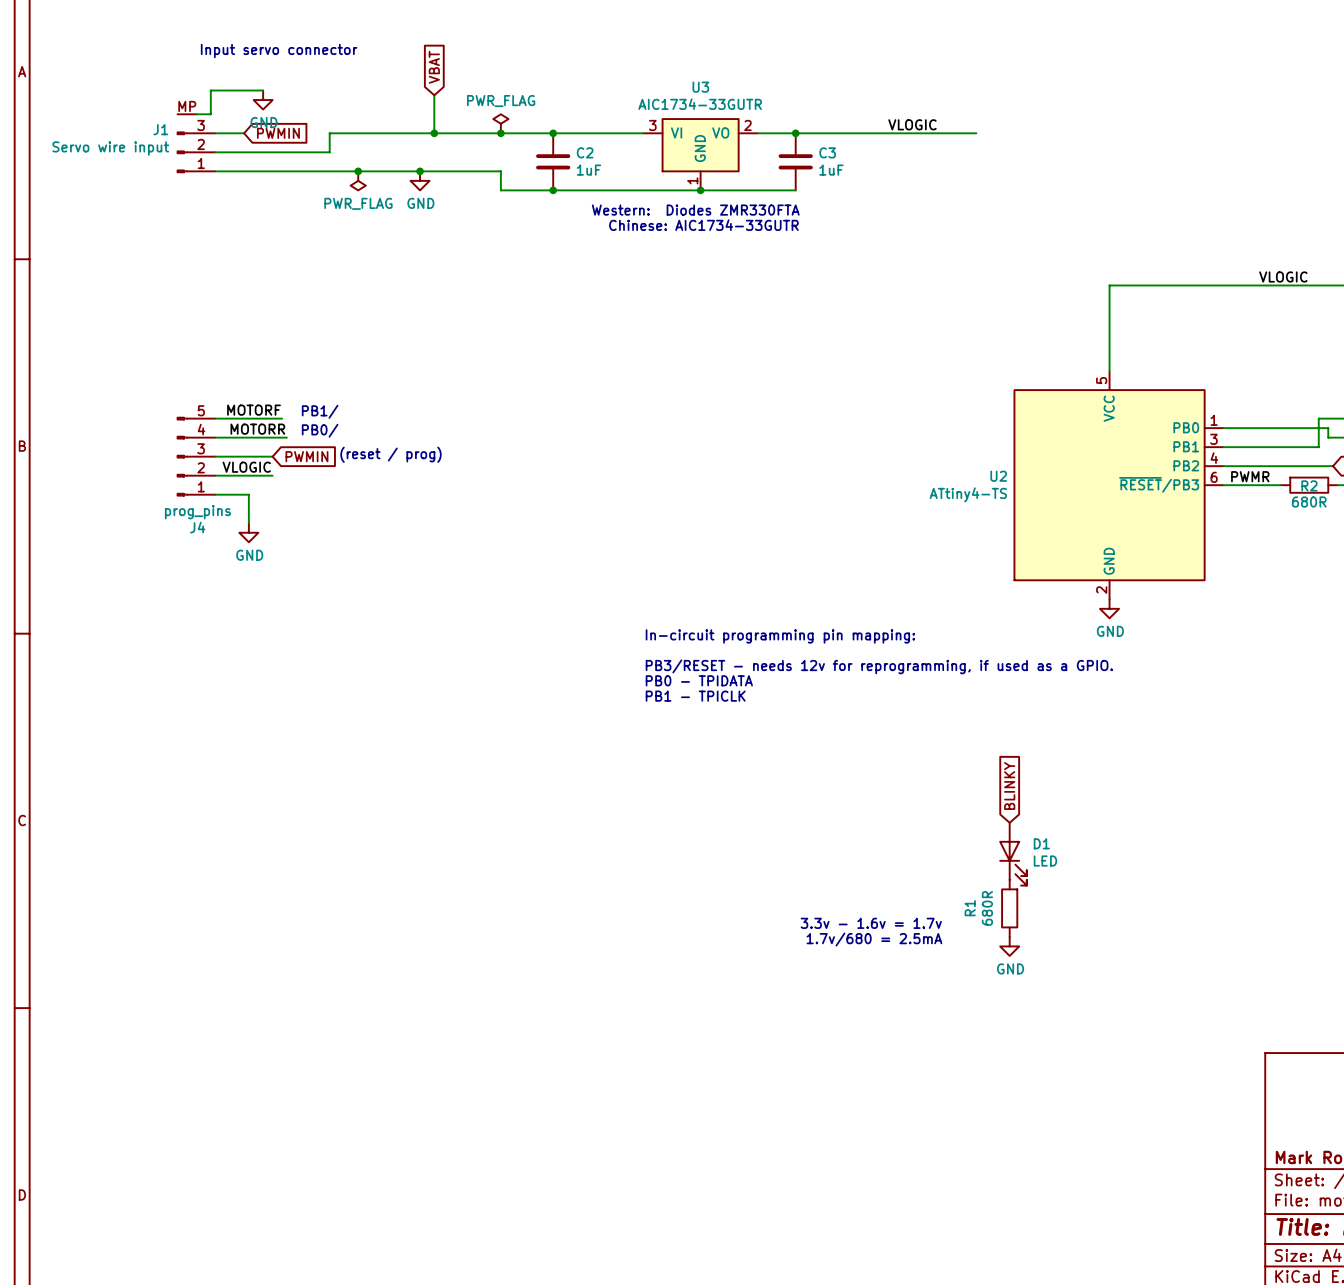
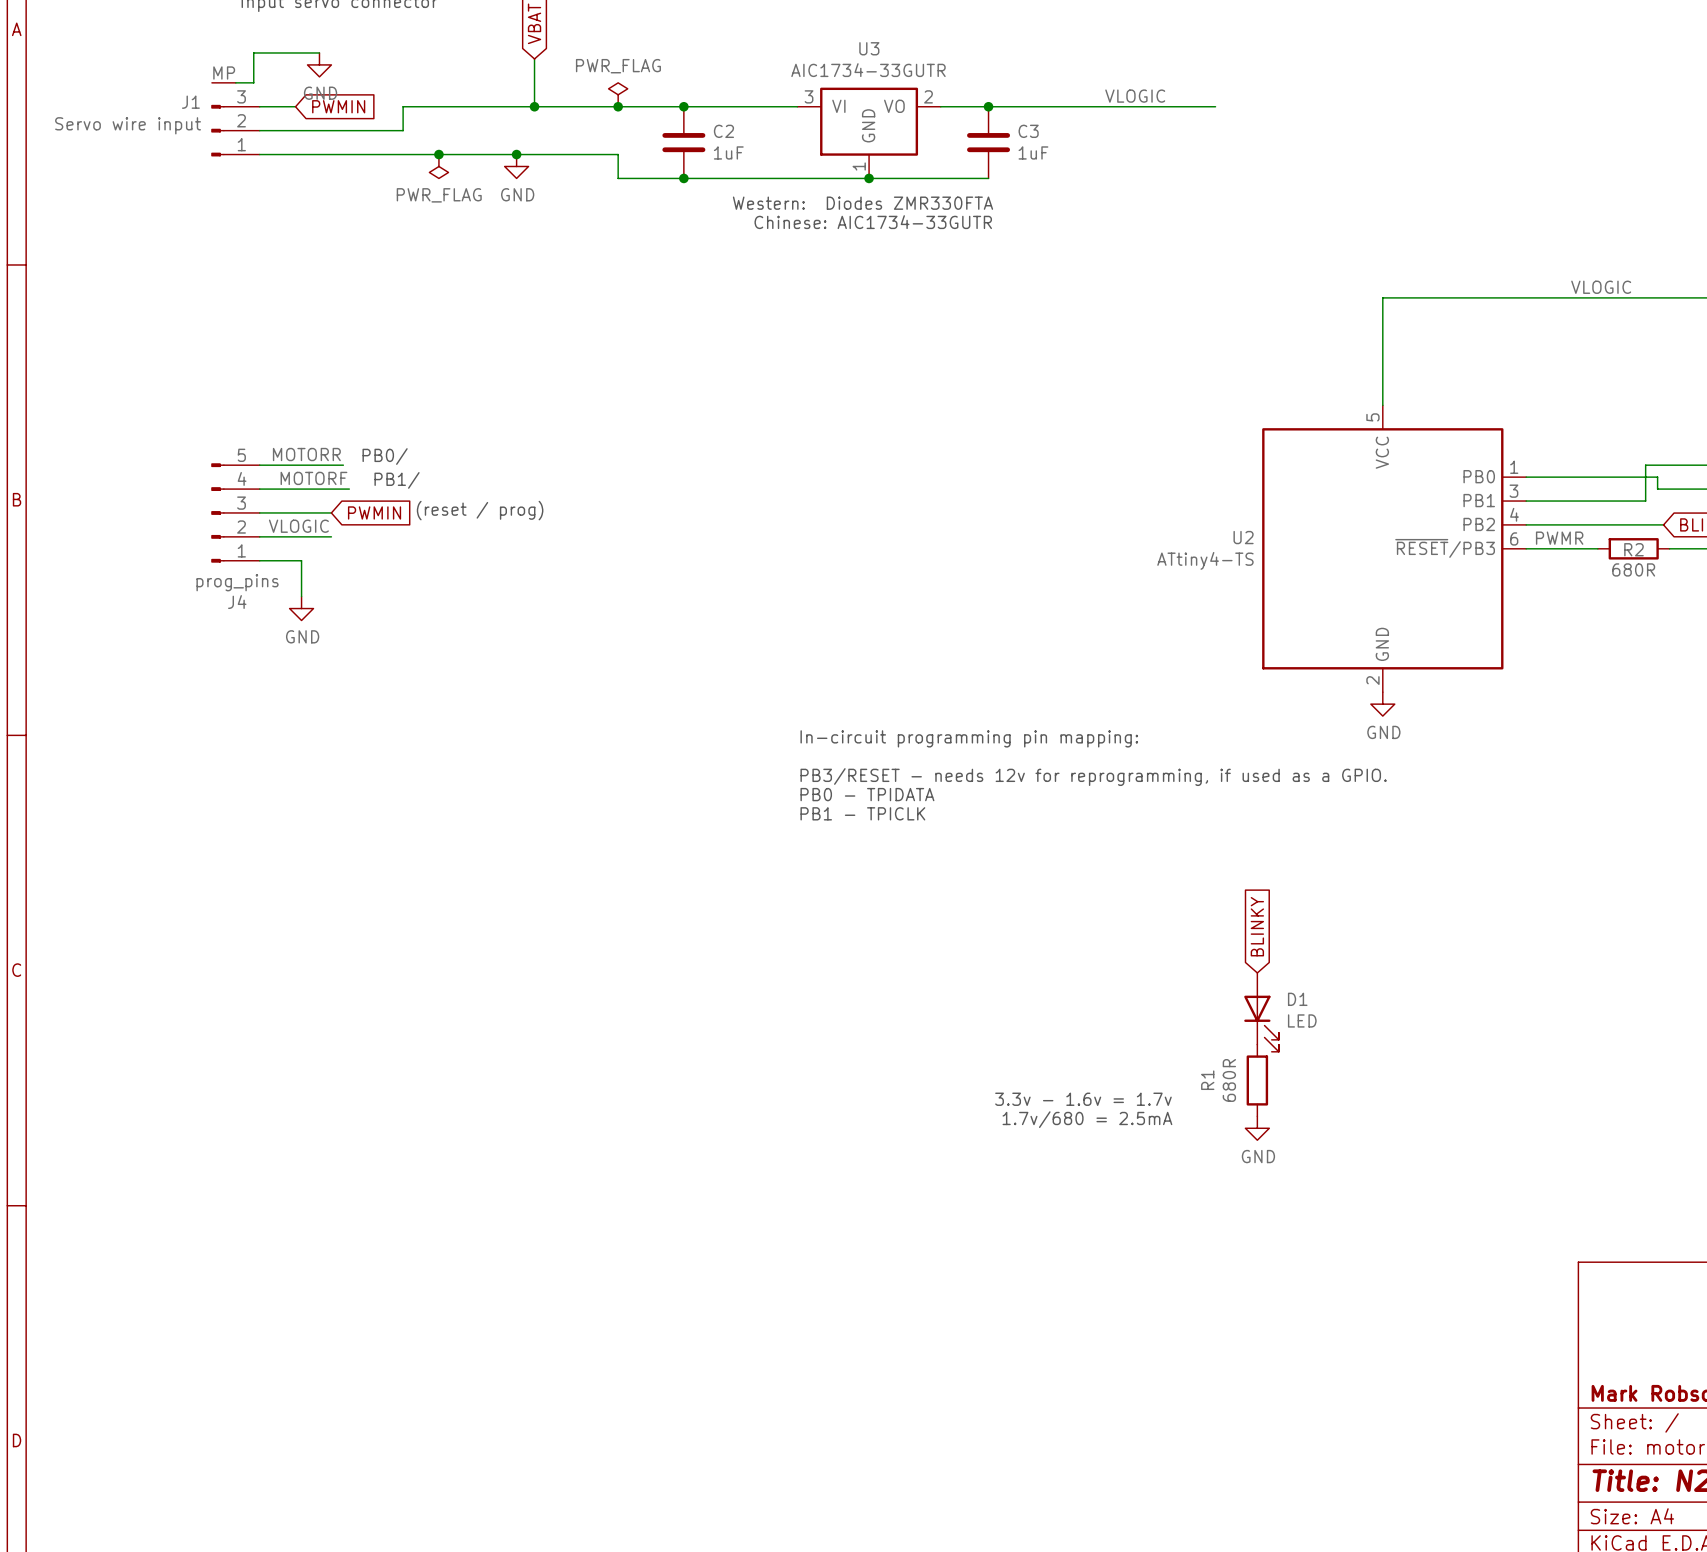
label: MOTORF (254, 410) -> MOTORR (306, 454)
text: PB1/ (320, 411) -> PB0/ (385, 456)
label: MOTORR (257, 429) -> MOTORF (313, 478)
text: PB0/ (320, 430) -> PB1/ (397, 480)

